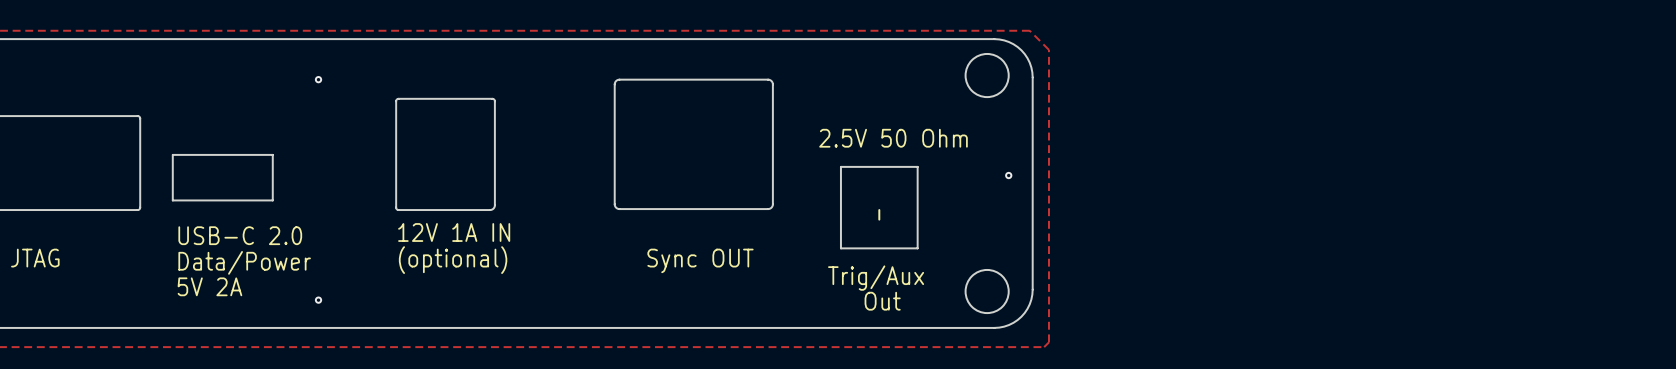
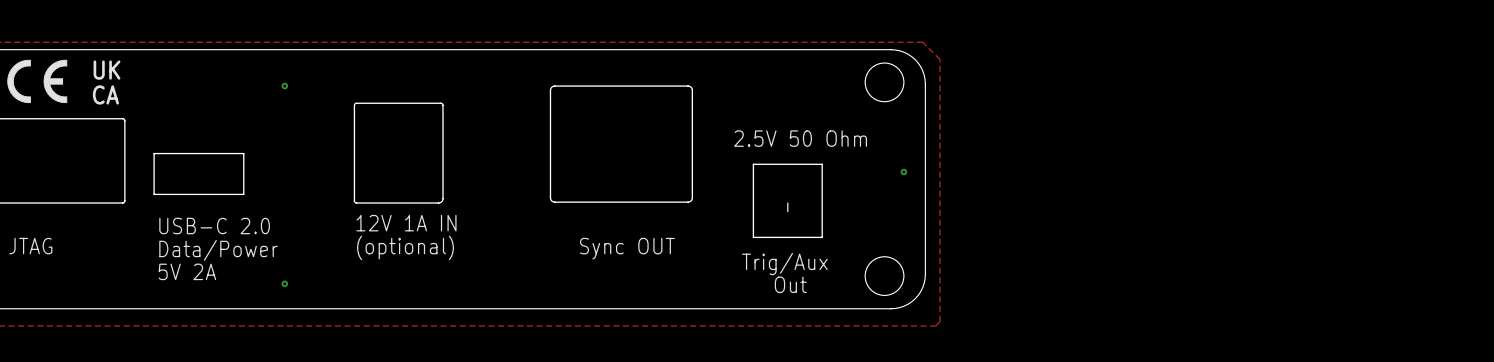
drawing: none -> [7, 59, 68, 104]
text: none -> UK (106, 70)
text: none -> CA (105, 94)

